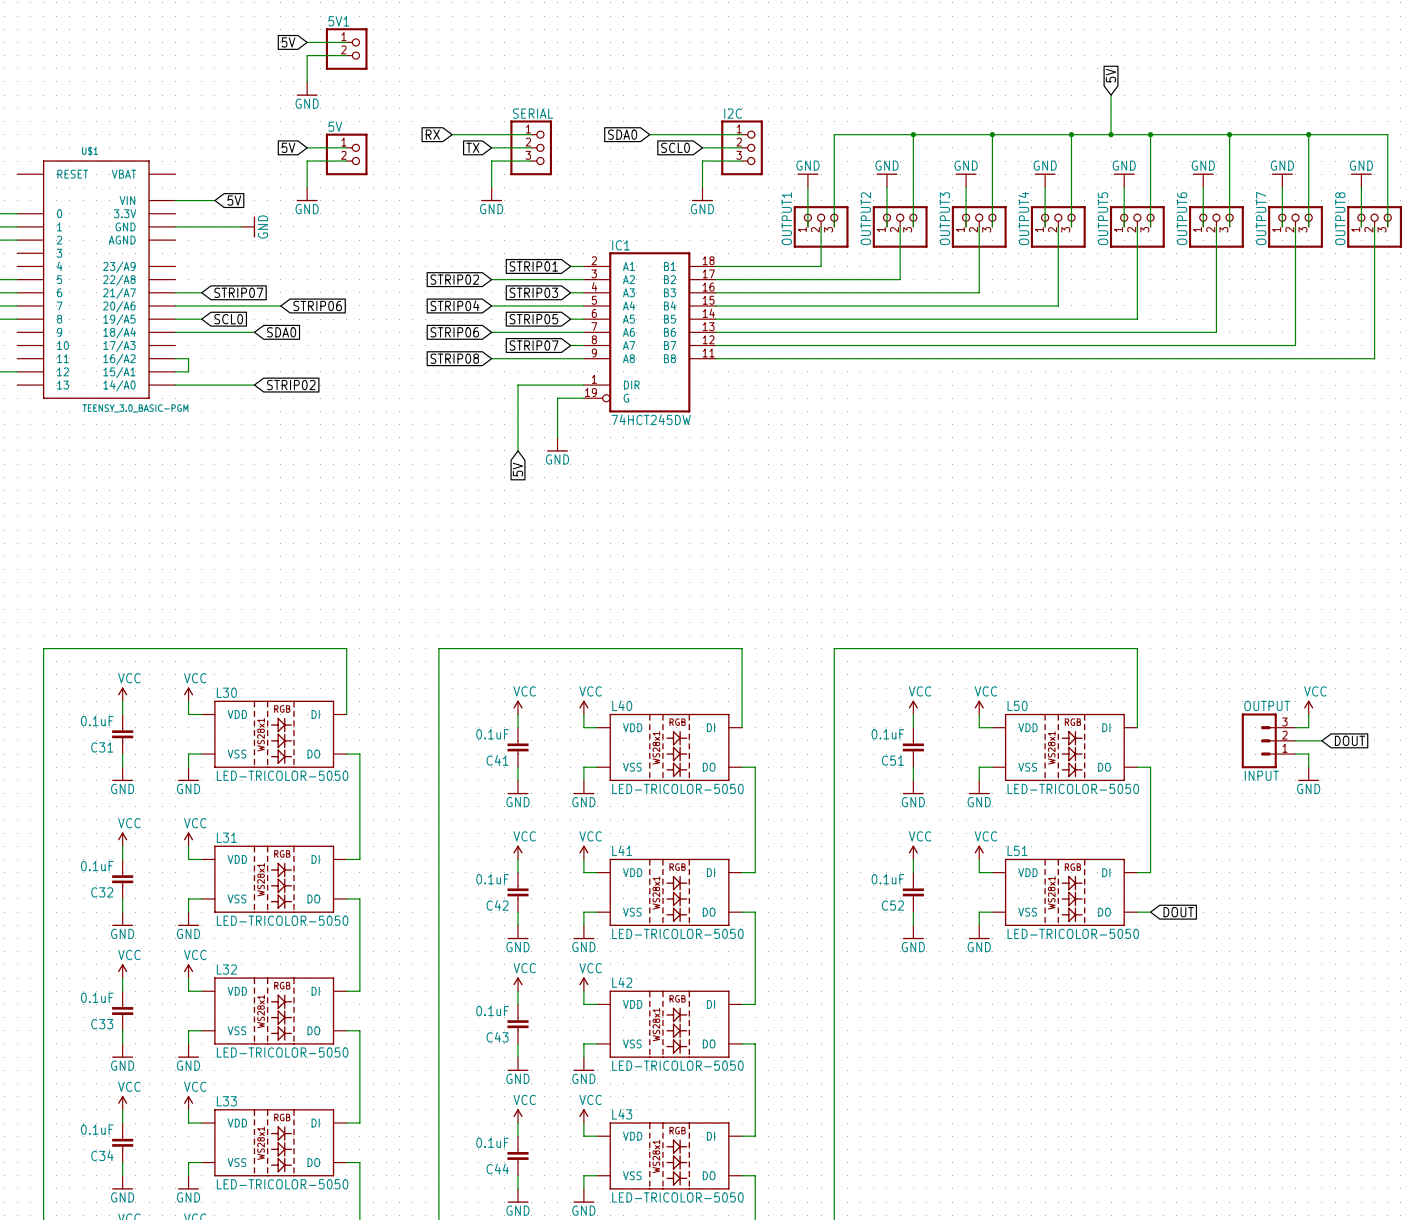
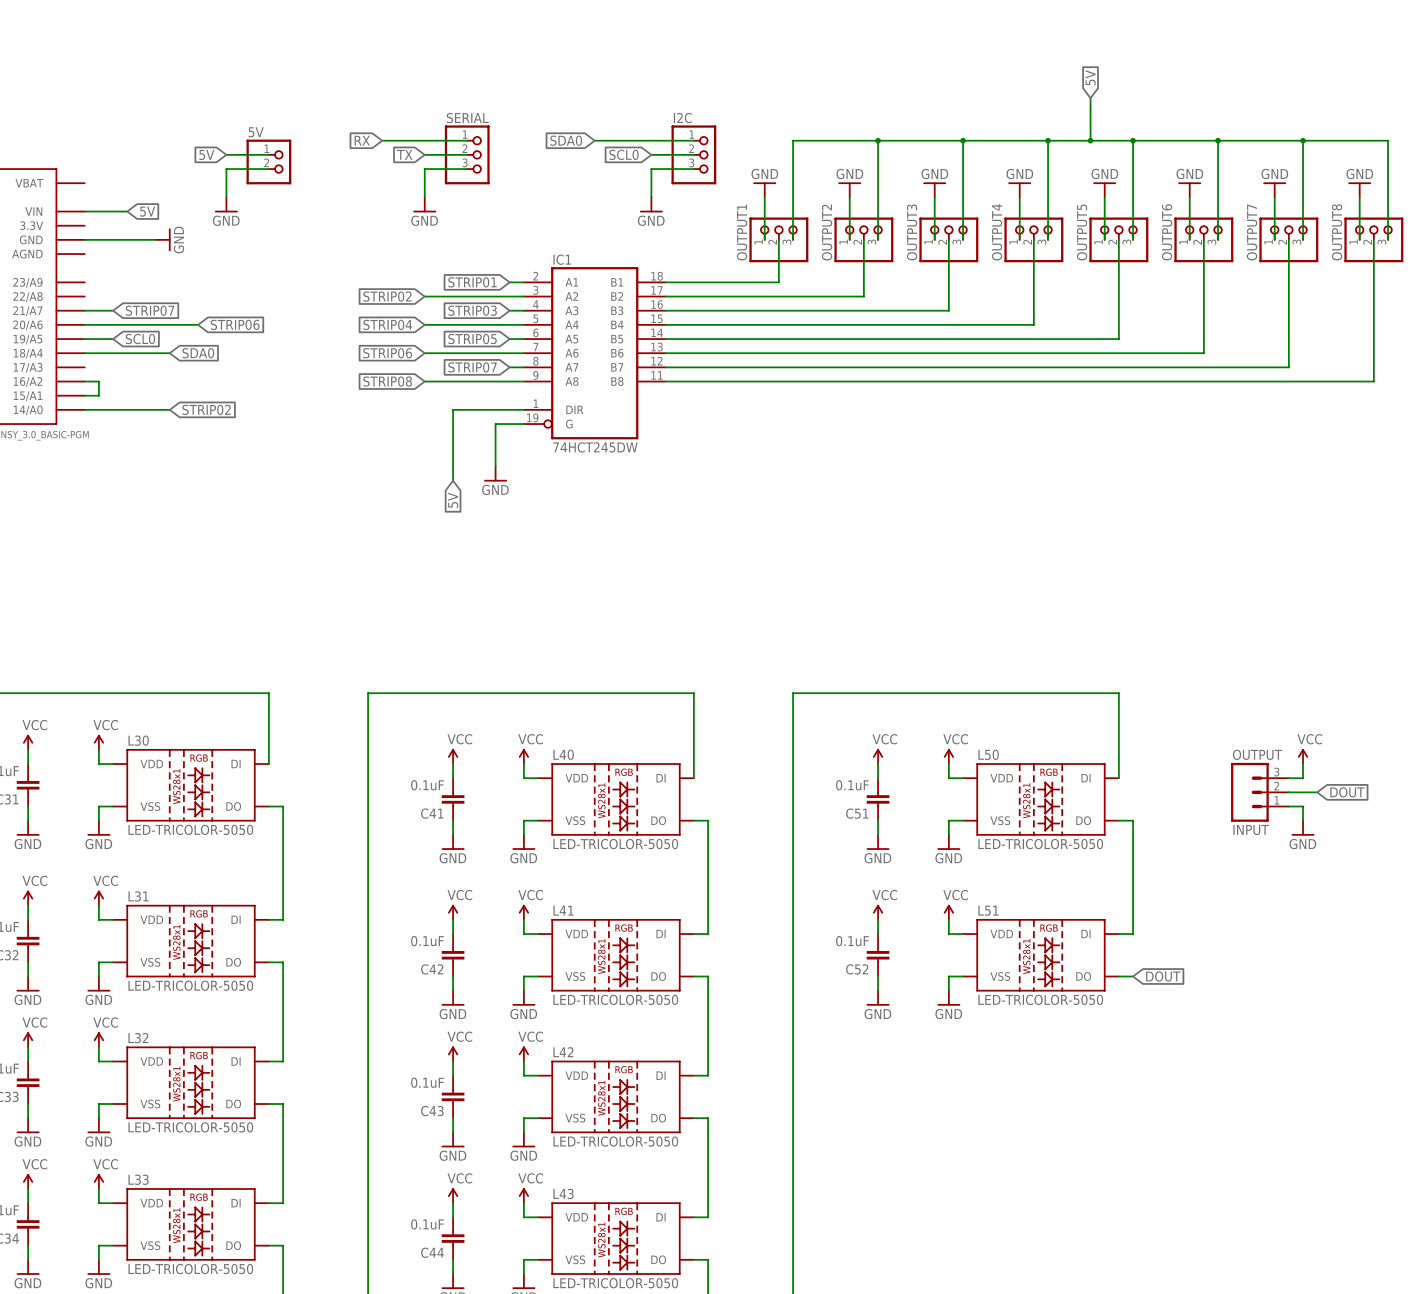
global label: 5V (288, 42) -> none
wire: (307, 42) (346, 42) -> none
5V1: (346, 49) -> none
wire: (346, 55) (307, 55) (307, 81) -> none
power symbol: GND (307, 88) -> none

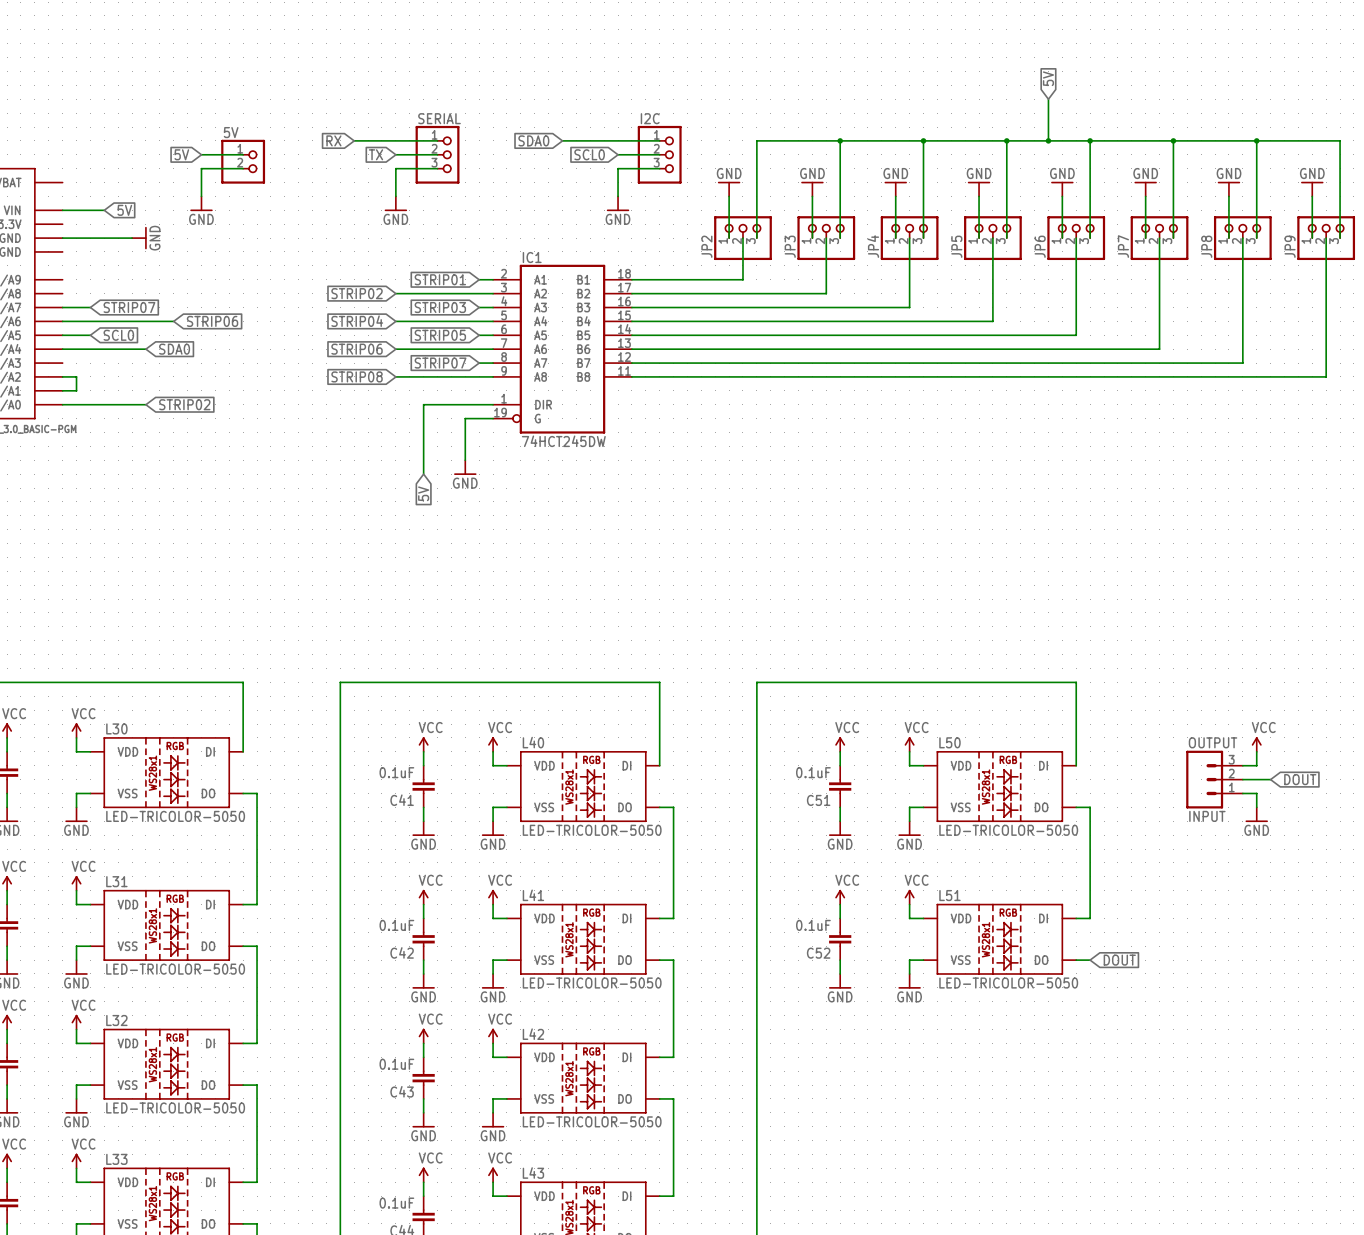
OUTPUT1 name: OUTPUT1 (742, 232) -> JP2 (706, 246)
OUTPUT2 name: OUTPUT2 (827, 232) -> JP3 (790, 246)
OUTPUT3 name: OUTPUT3 (912, 232) -> JP4 (873, 246)
OUTPUT4 name: OUTPUT4 (997, 232) -> JP5 (956, 246)
OUTPUT5 name: OUTPUT5 (1082, 232) -> JP6 (1040, 246)
OUTPUT6 name: OUTPUT6 (1167, 232) -> JP7 (1123, 246)
OUTPUT7 name: OUTPUT7 (1252, 232) -> JP8 (1206, 246)
OUTPUT8 name: OUTPUT8 (1337, 232) -> JP9 (1290, 246)

